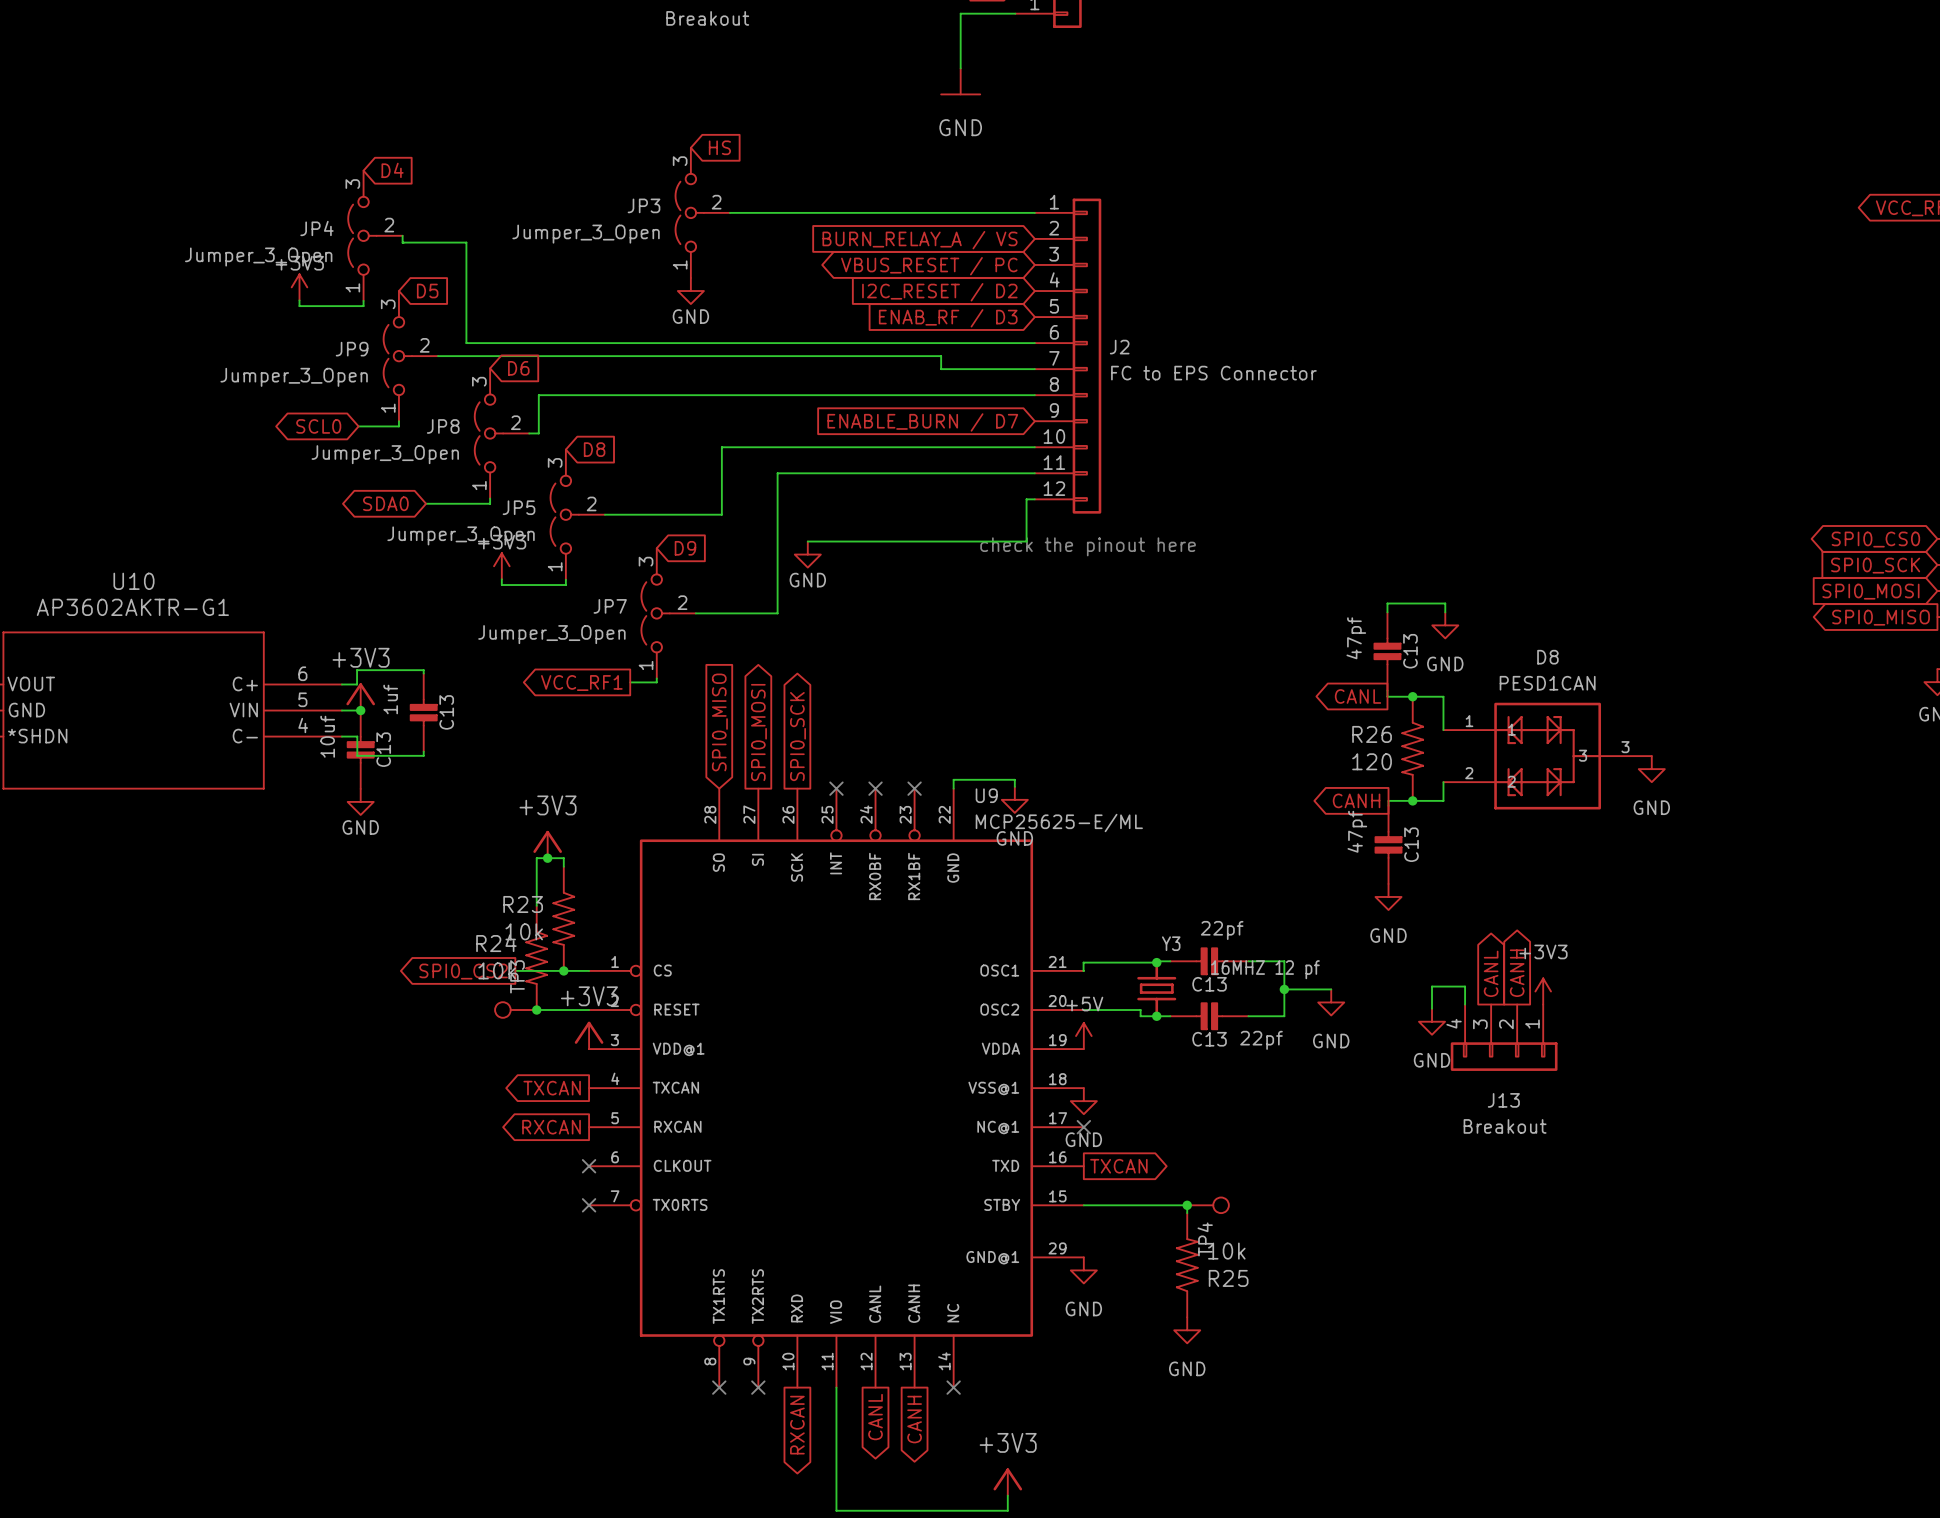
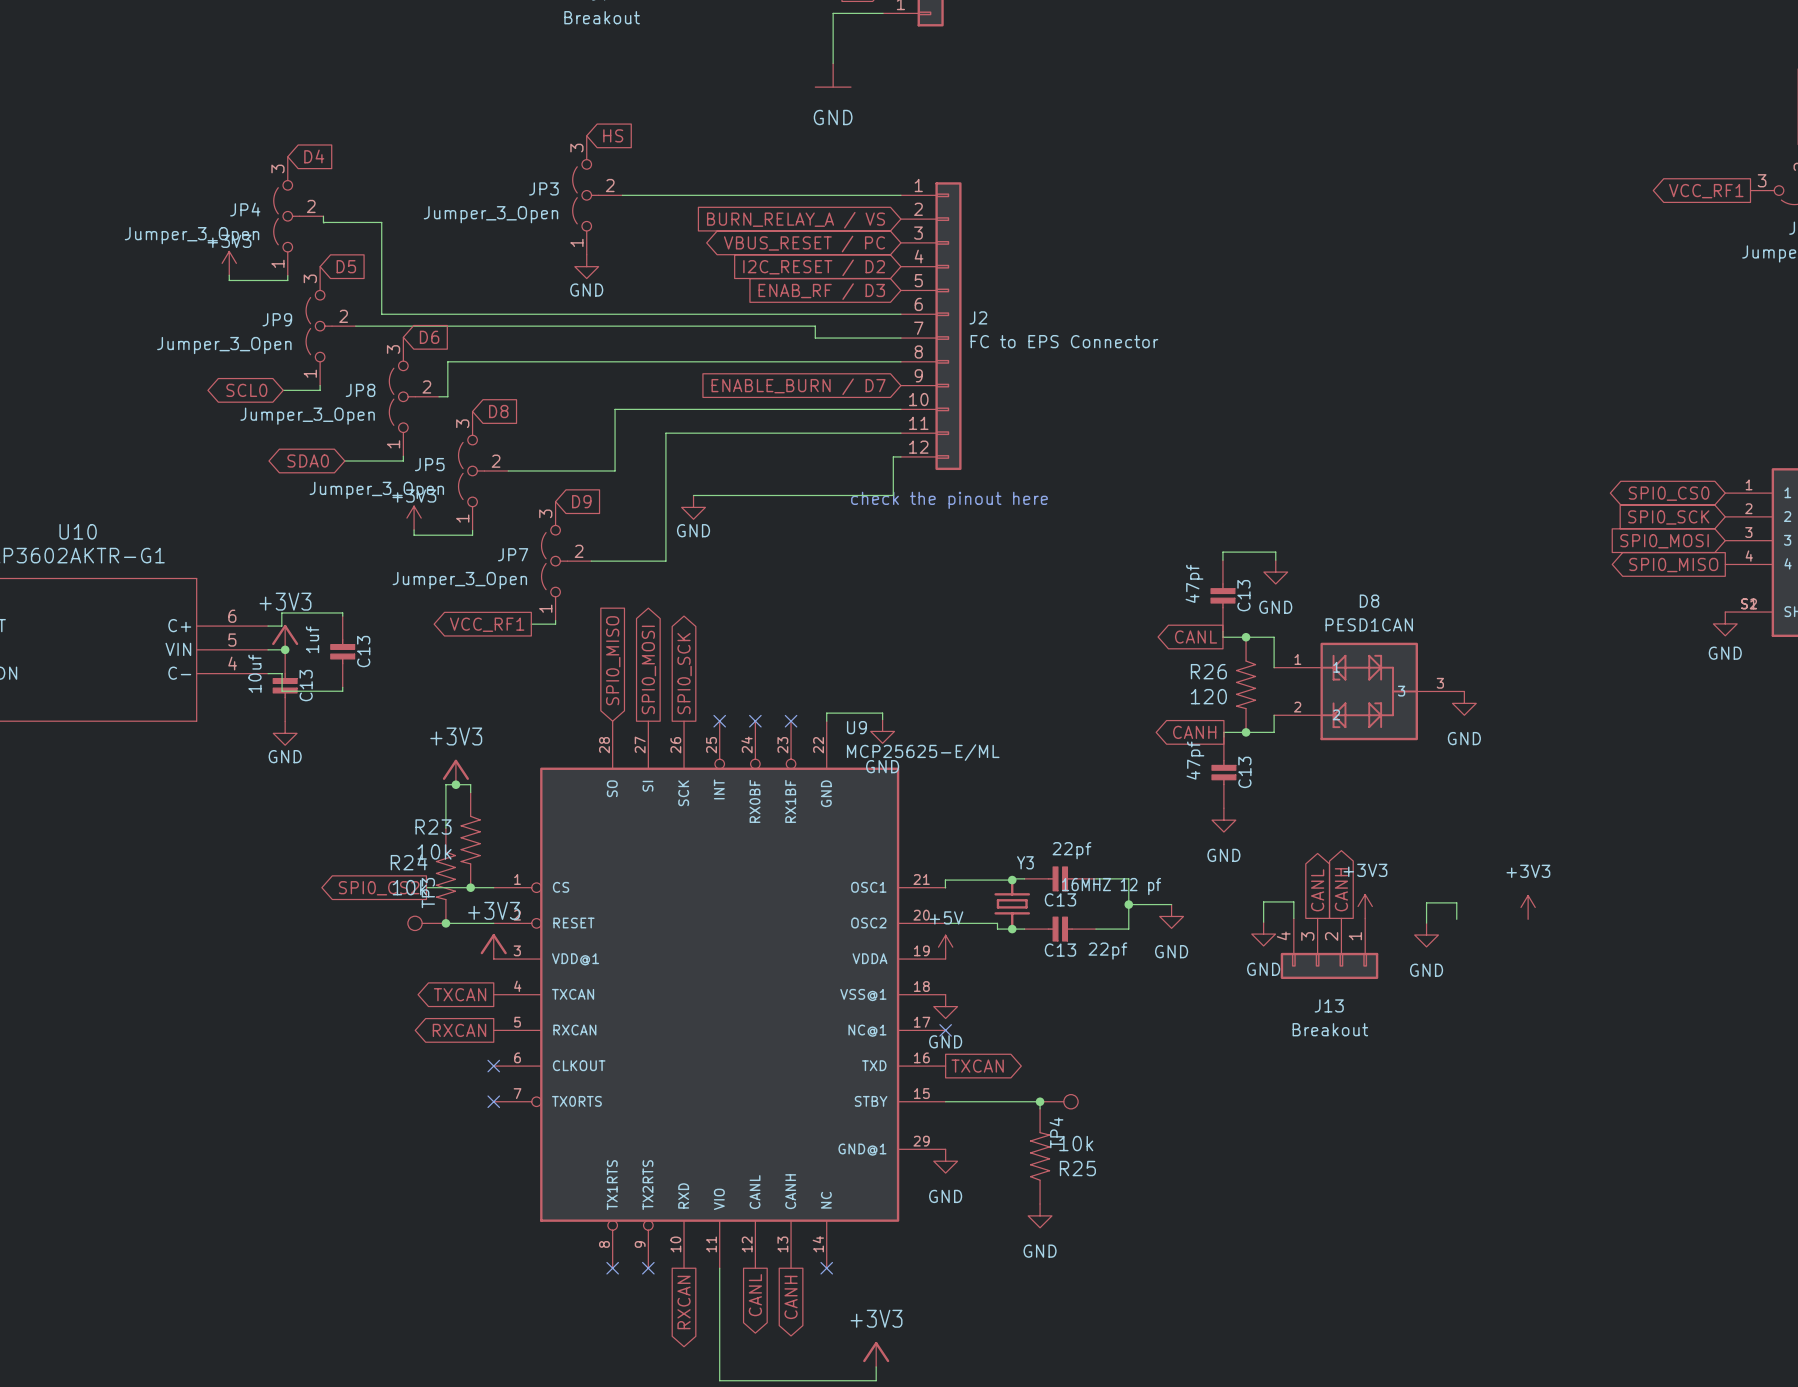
power symbol: none -> +3V3 (1528, 907)
wire: none -> (1456, 919) (1456, 902) (1426, 902) (1426, 923)
power symbol: none -> GND (1426, 935)

